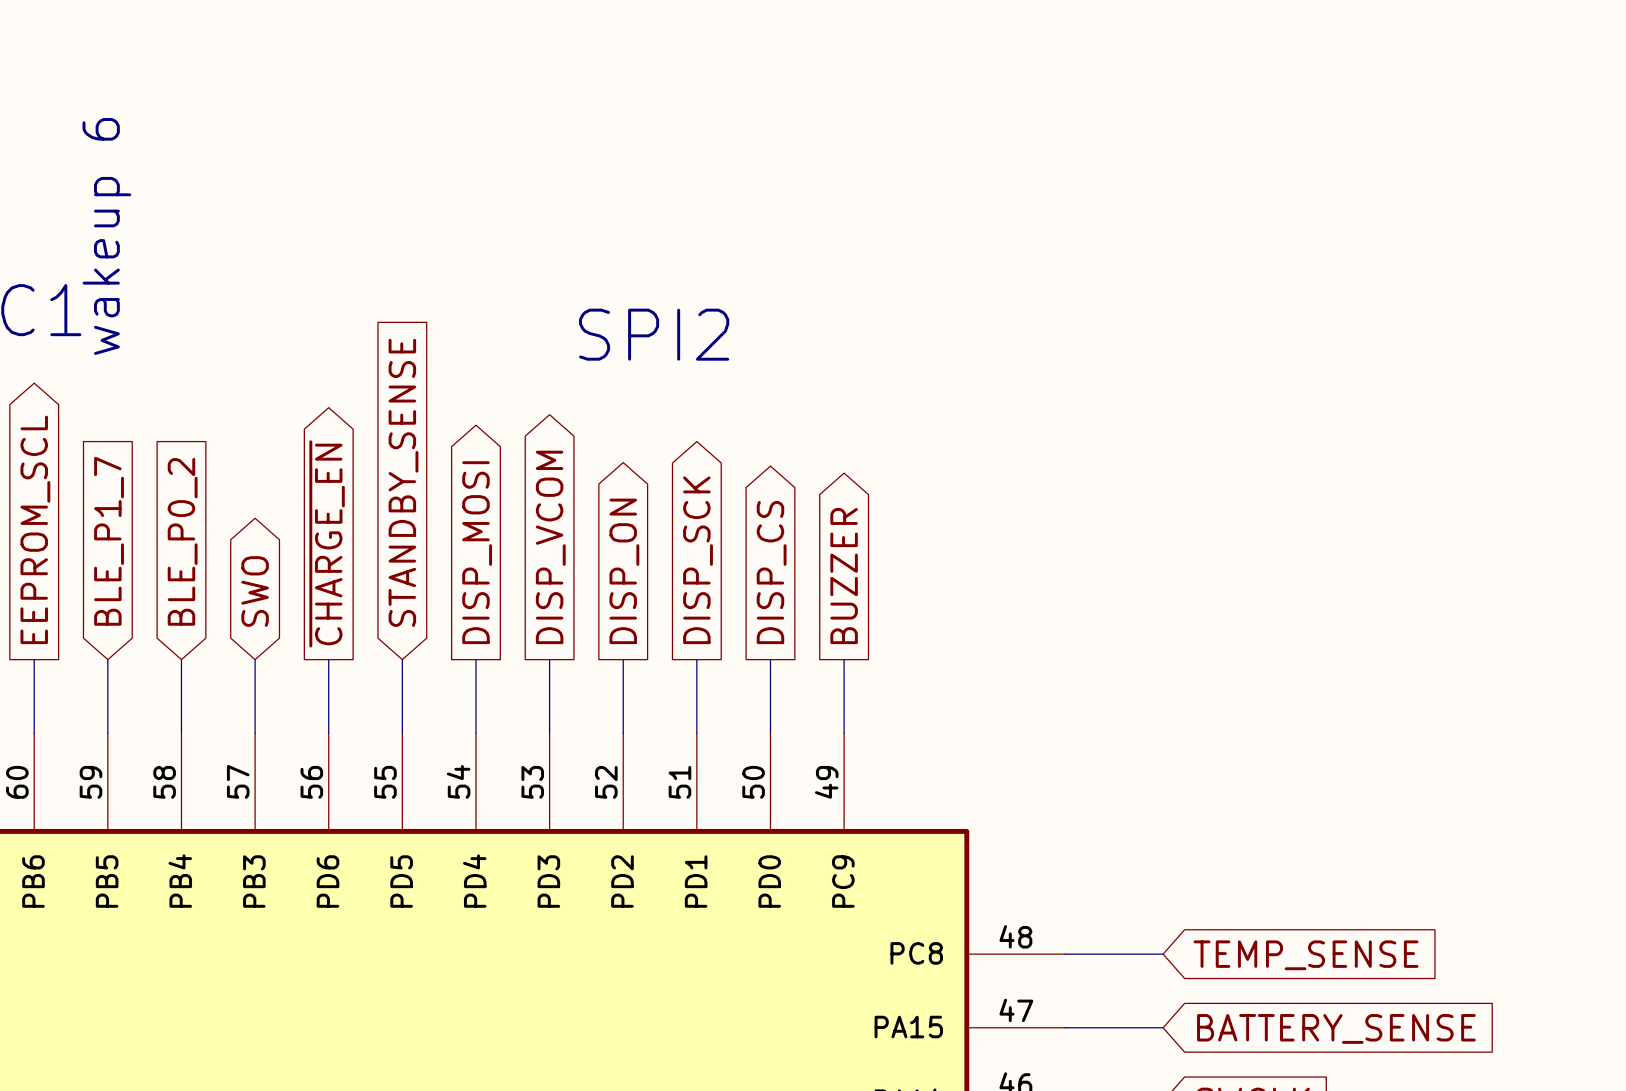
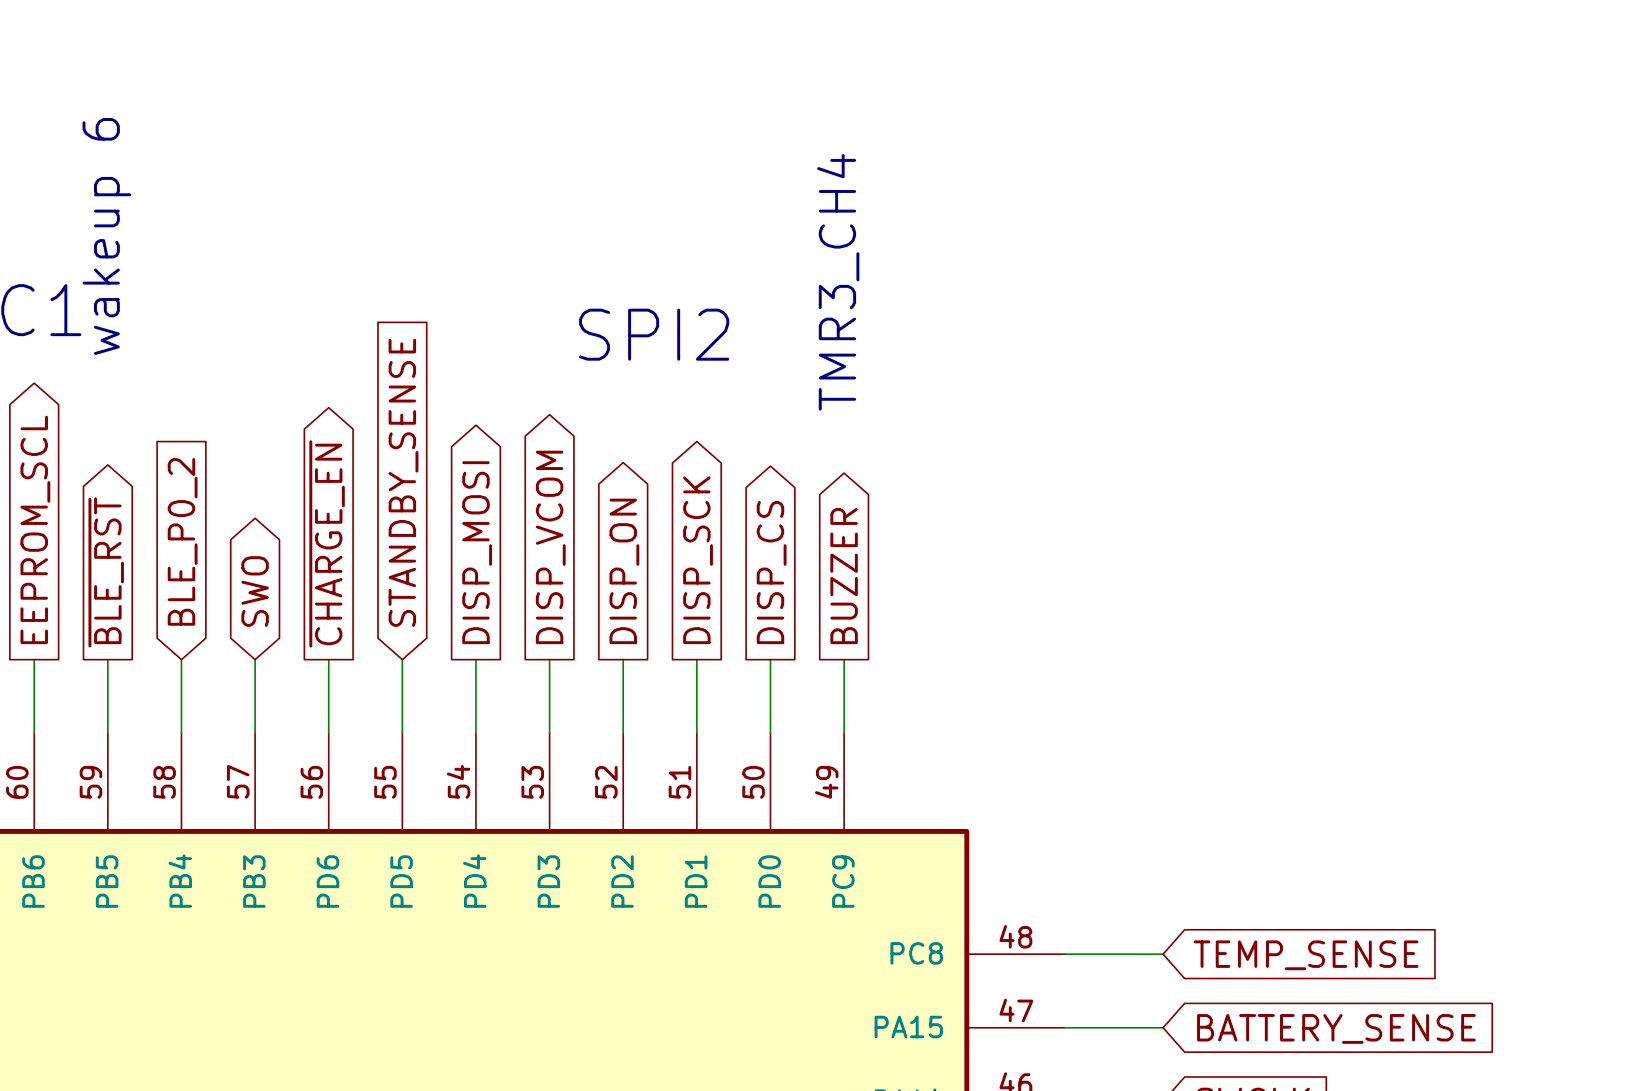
text: none -> TMR3_CH4 (838, 282)
global label shape: input (109, 541) -> output (106, 572)
global label: BLE_P1_7 (109, 541) -> ~{BLE_RST} (106, 572)

